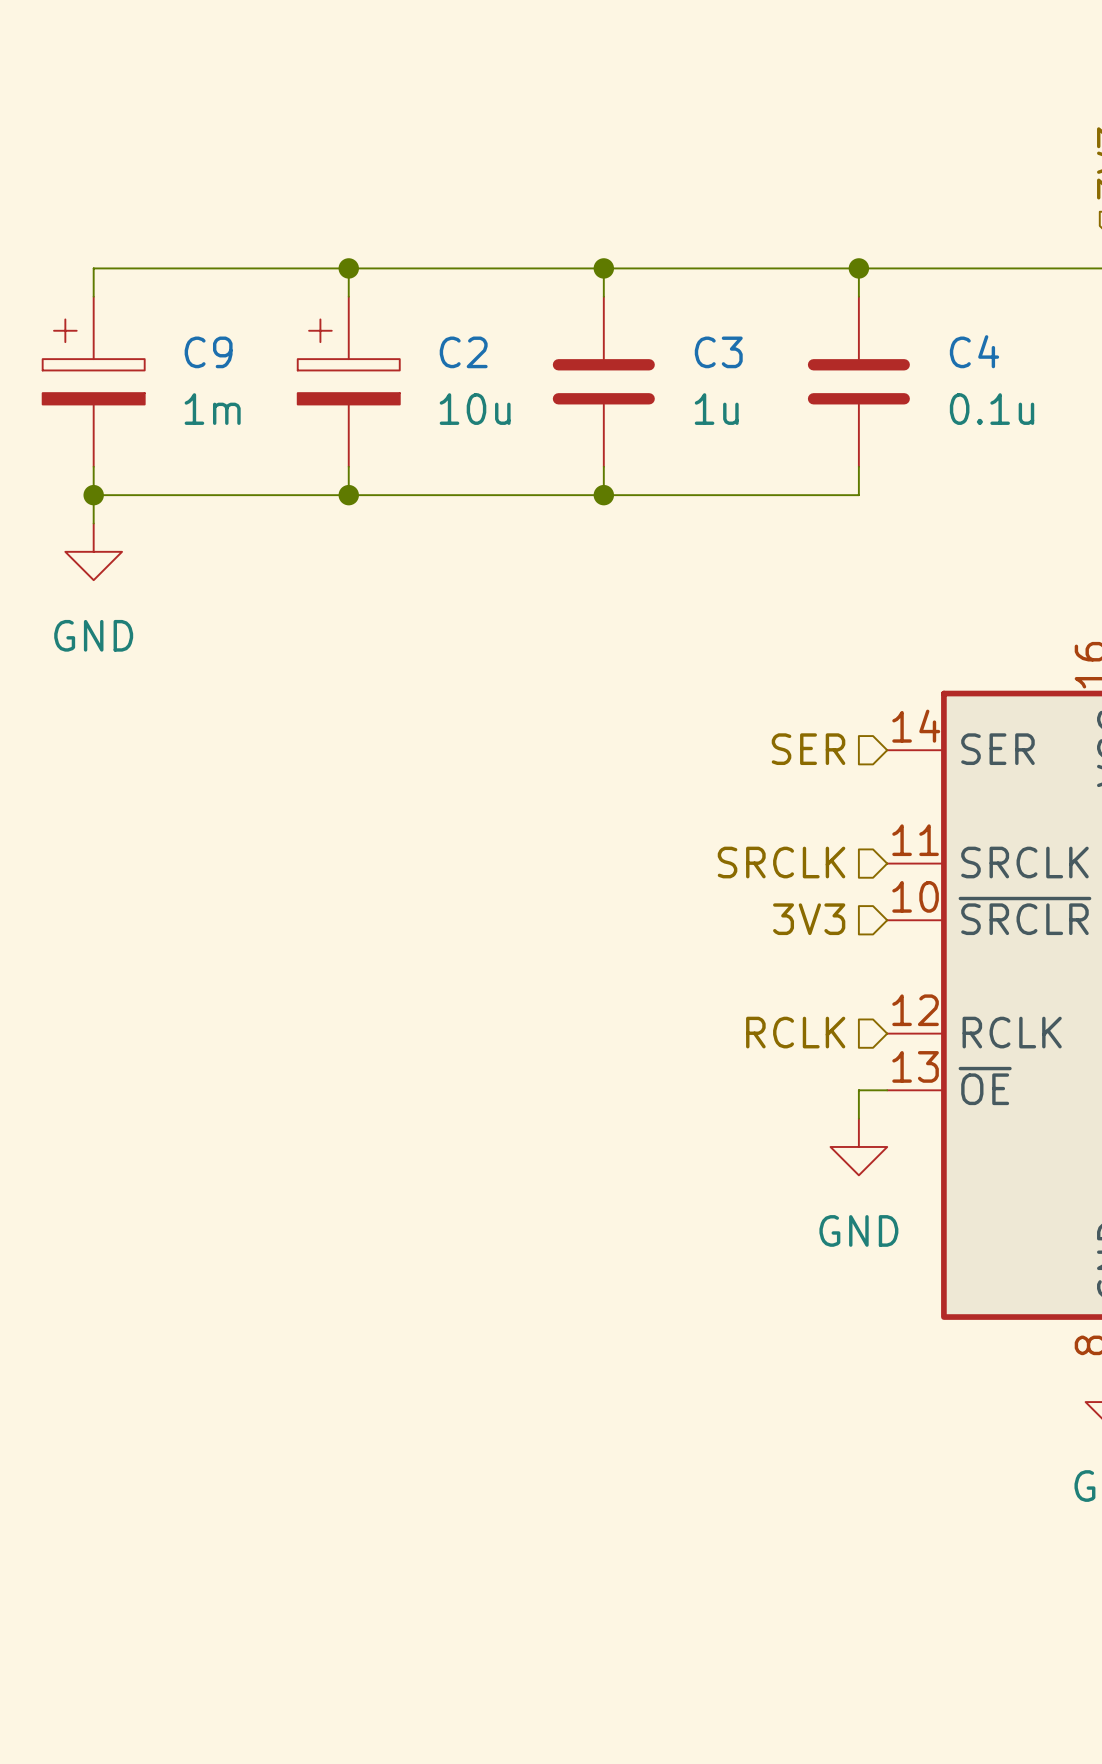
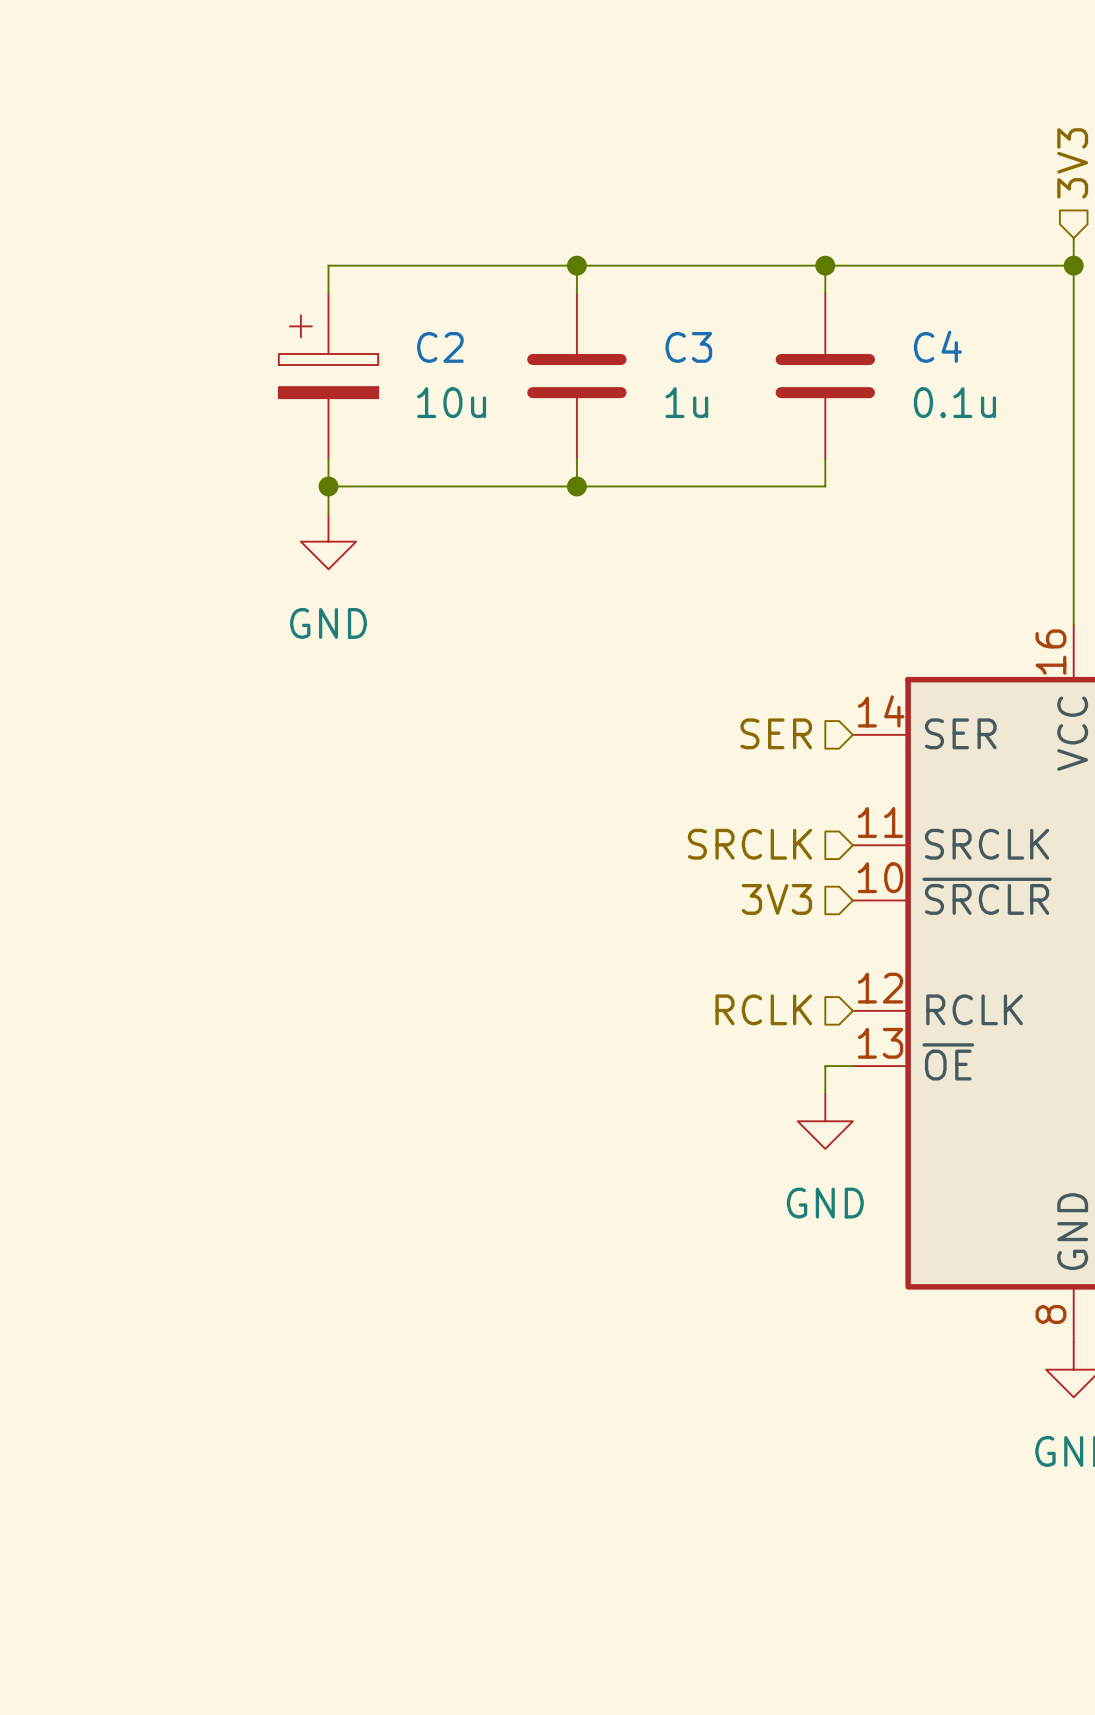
wire: (348, 268) (93, 268) (93, 296) -> none
junction: (348, 268) -> none
C9: 1m (93, 381) -> none
wire: (93, 466) (93, 523) -> none
wire: (93, 495) (348, 495) -> (328, 514) (328, 486)
junction: (93, 495) -> none
power symbol position: GND (93, 551) -> GND (328, 541)

